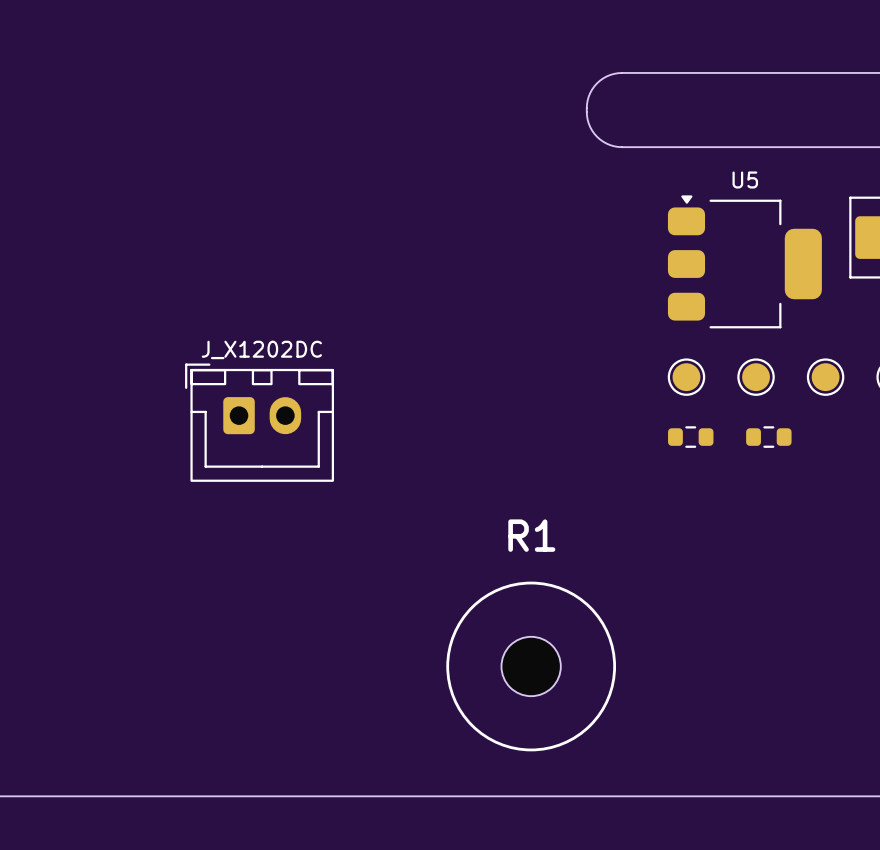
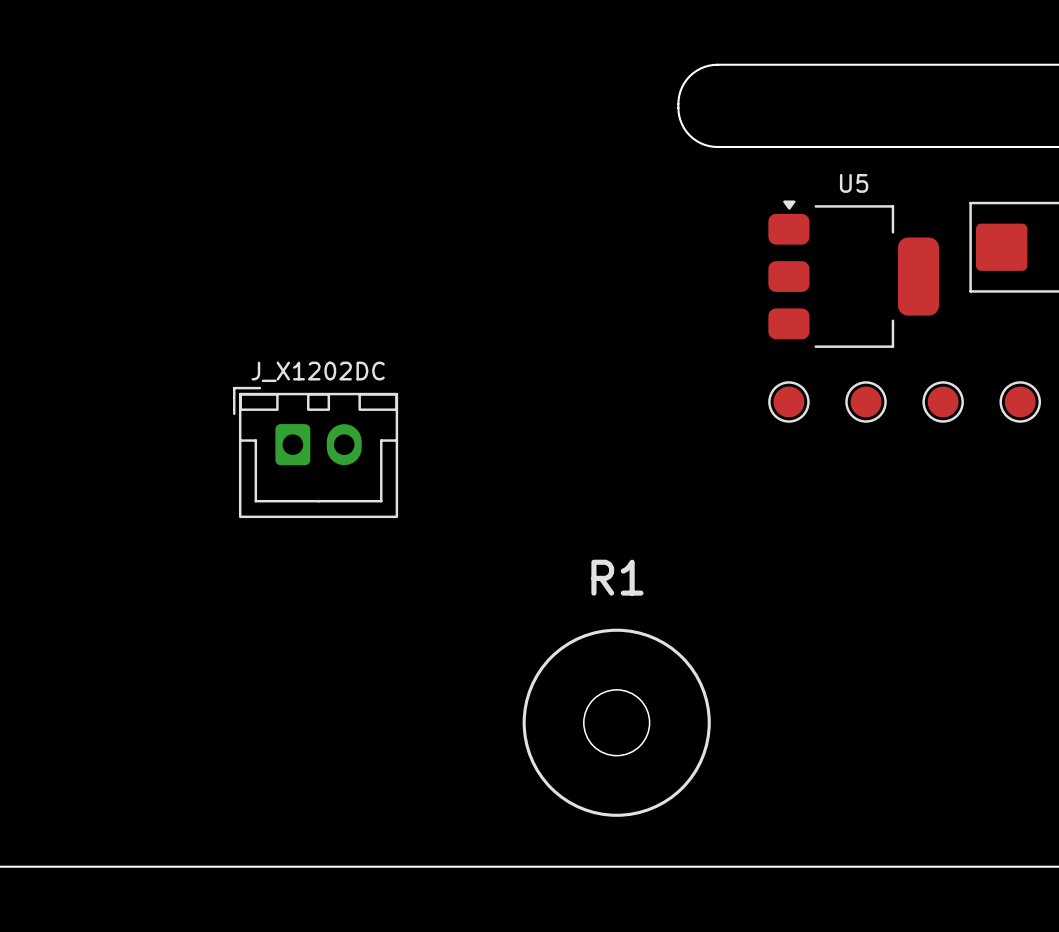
part: (690, 437) -> none
part: (768, 437) -> none

